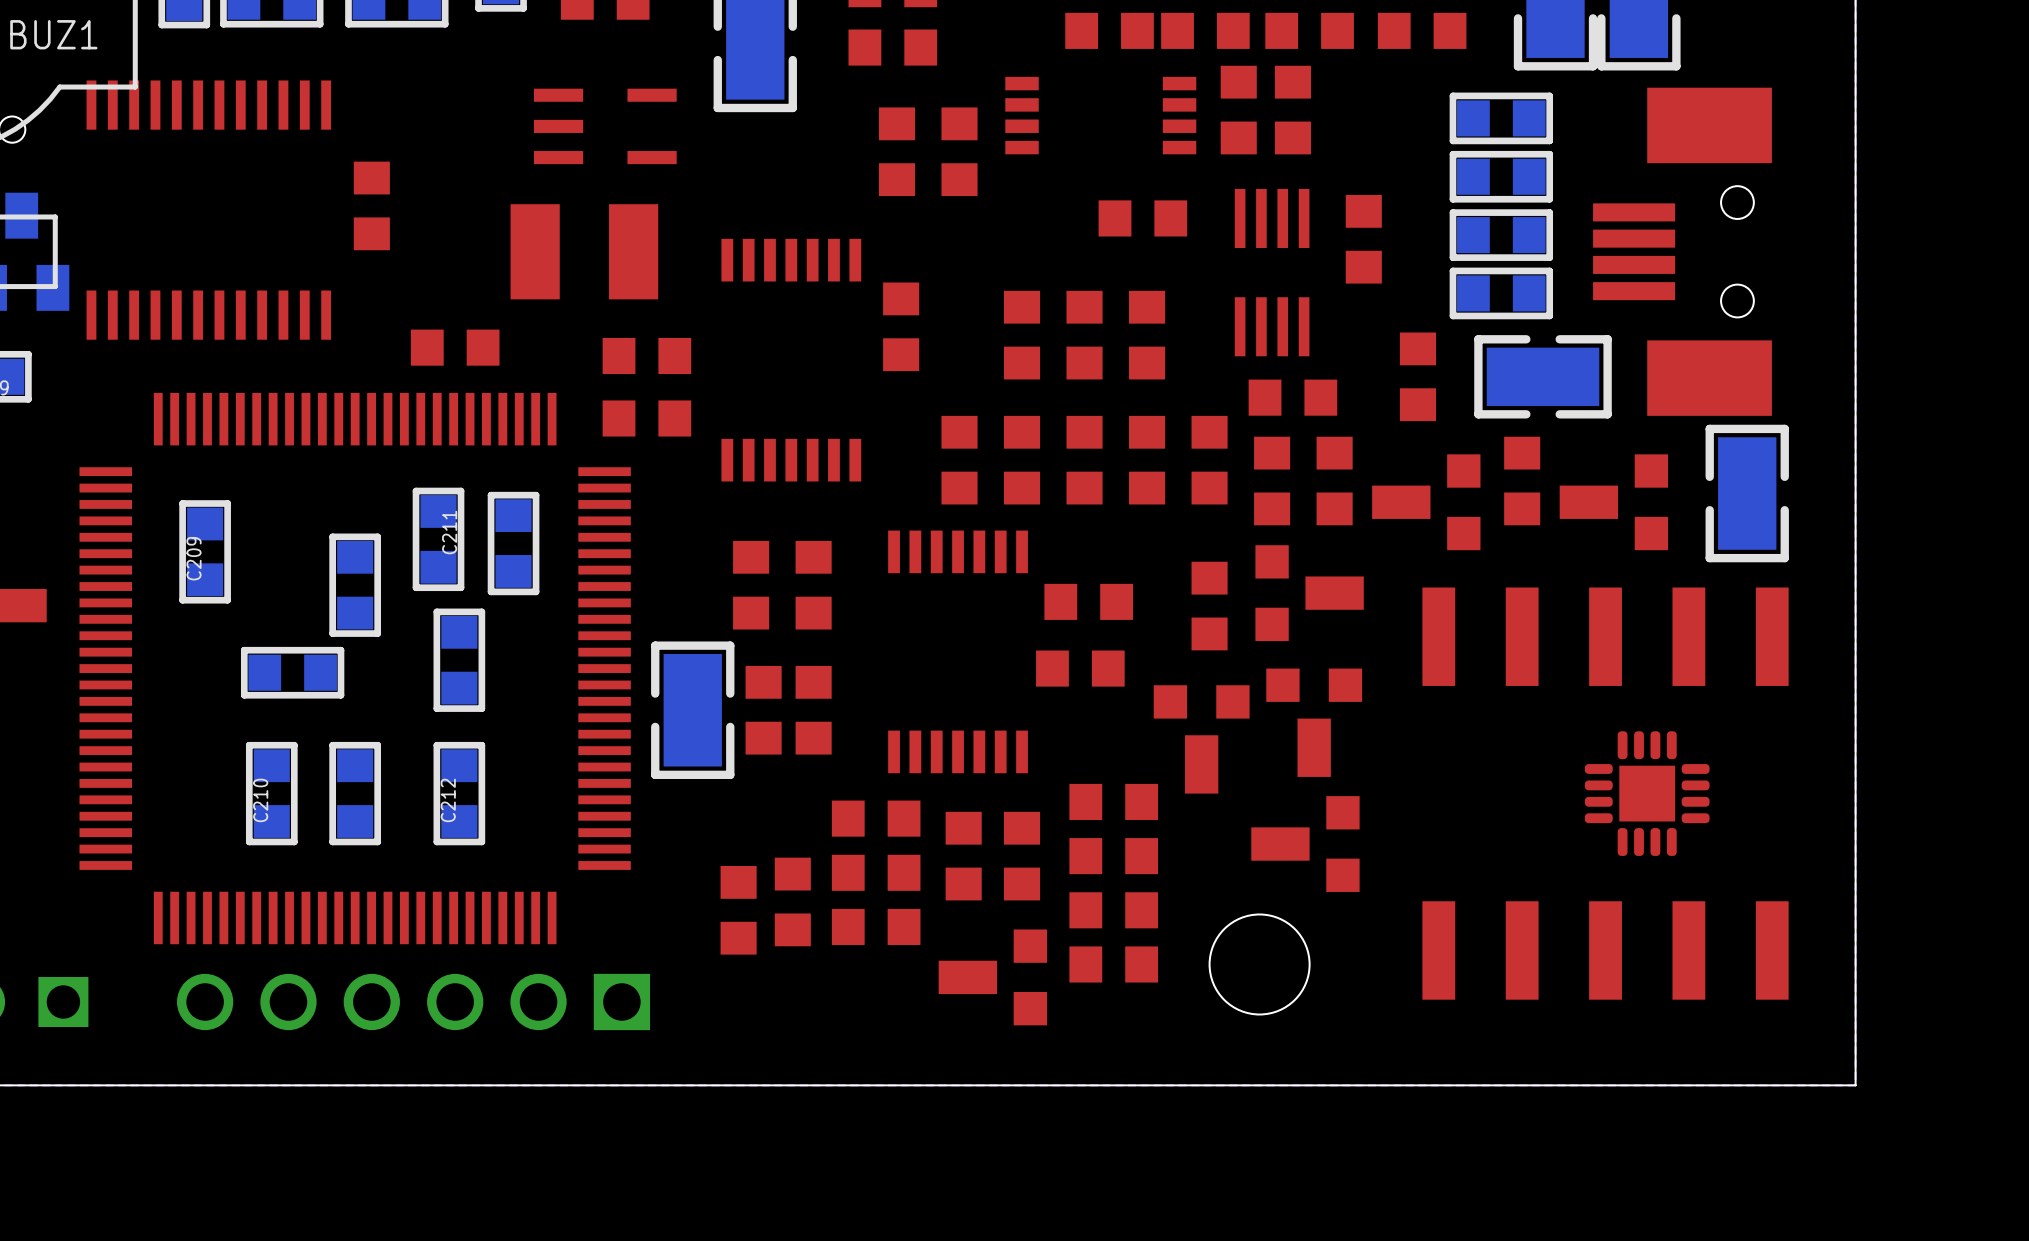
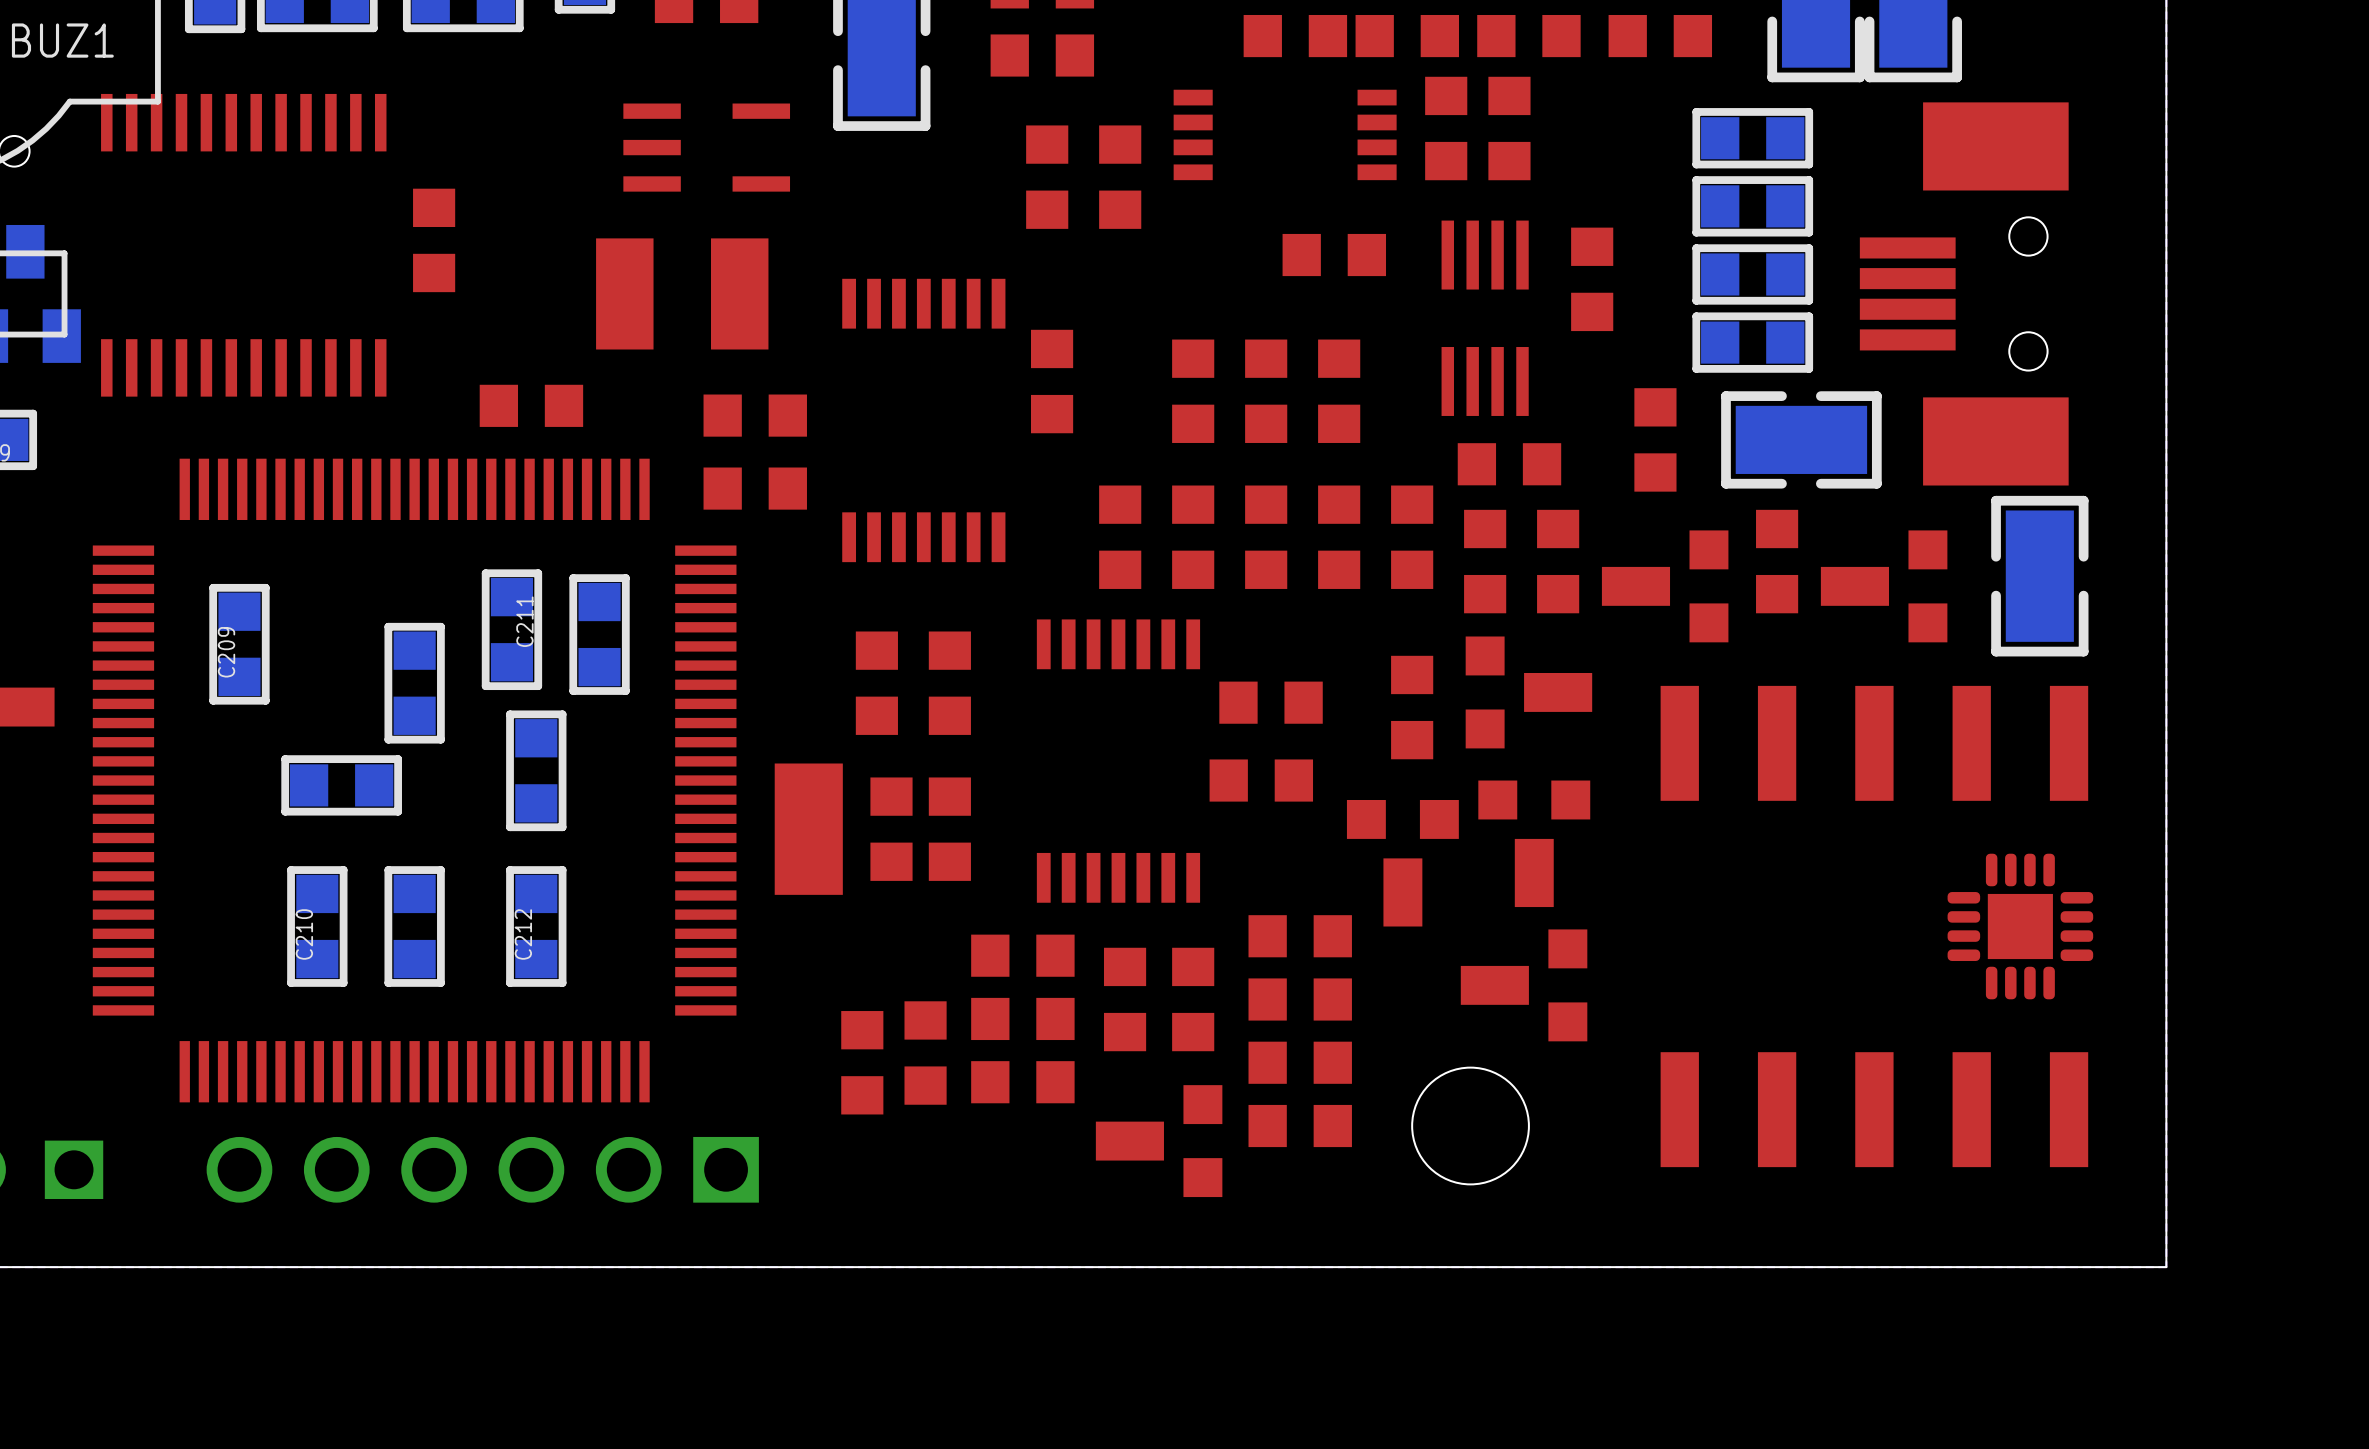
part side: bottom (692, 710) -> top (808, 829)
part position: (1647, 793) -> (2020, 926)

